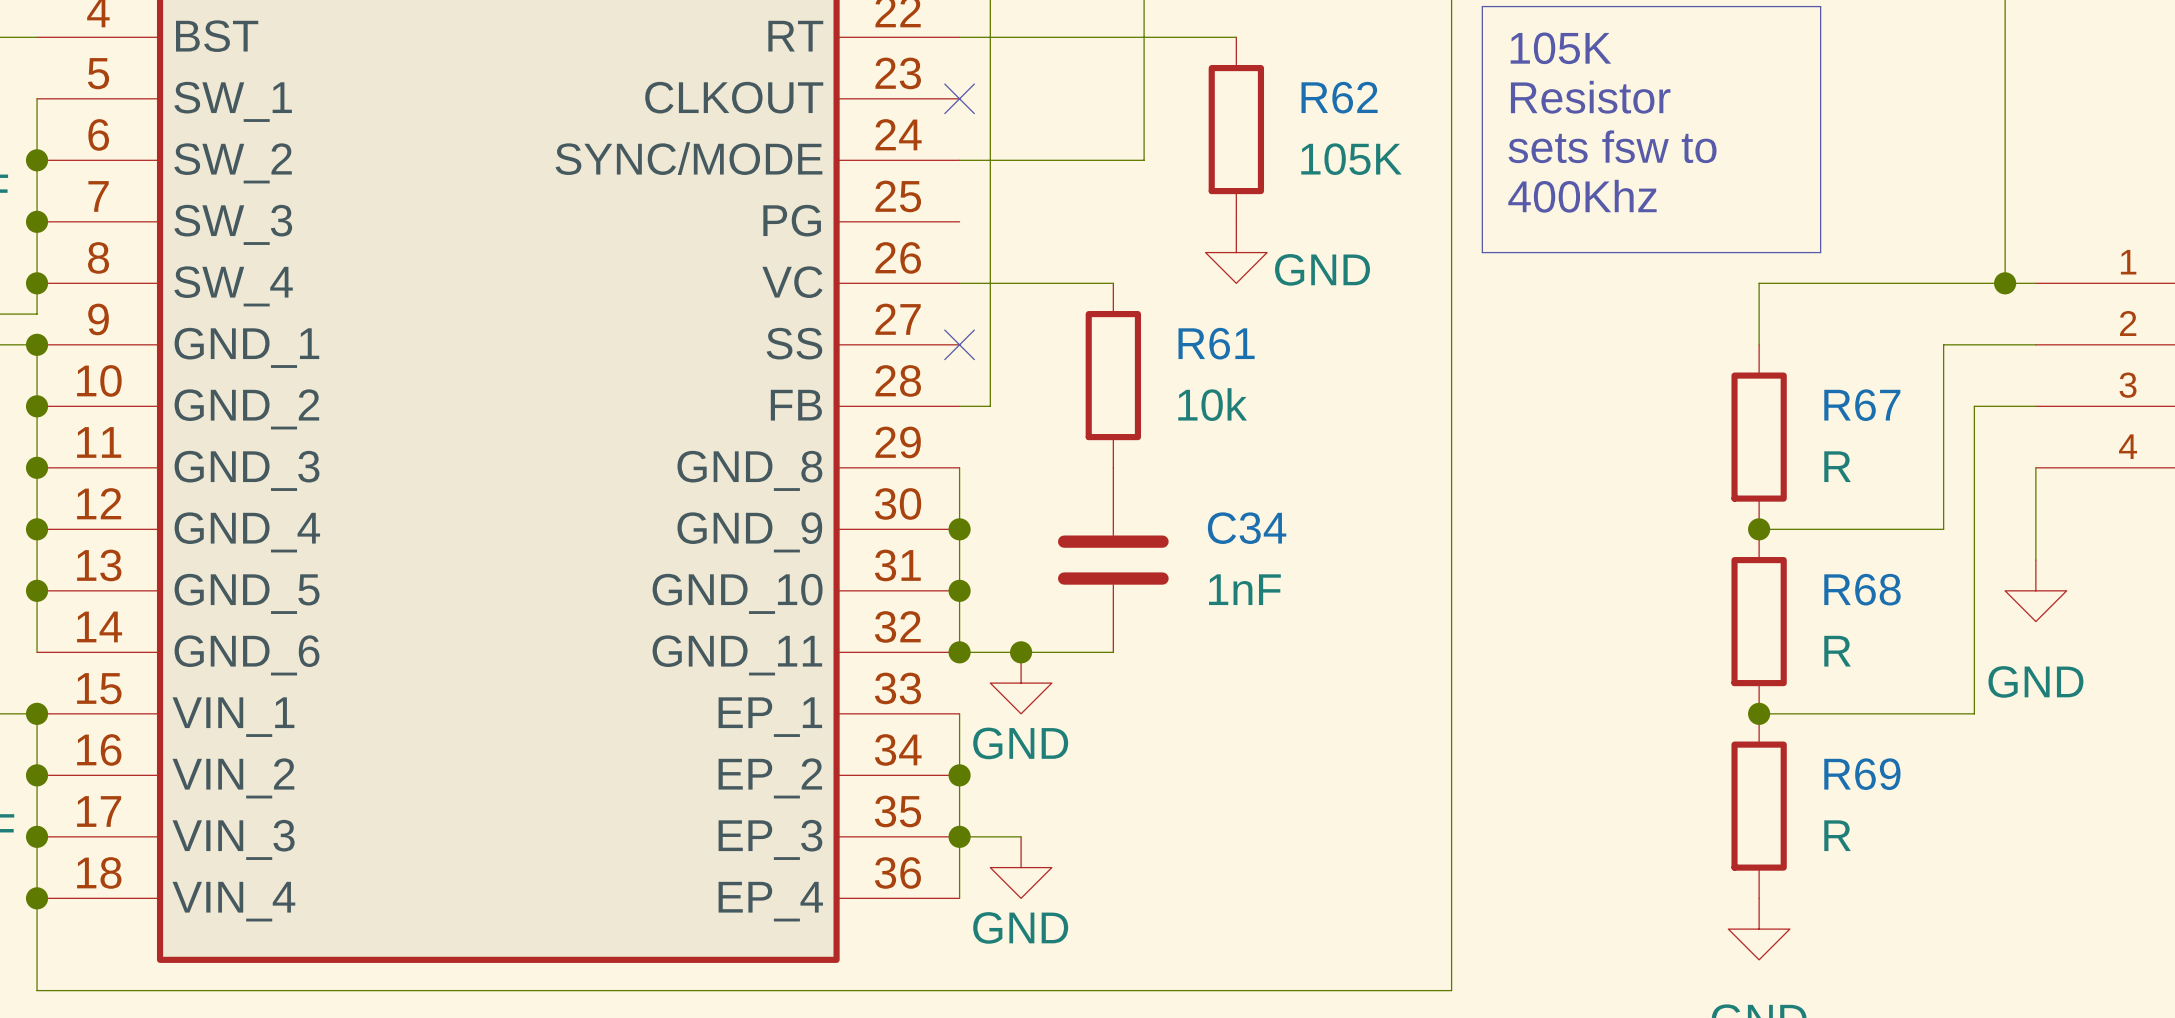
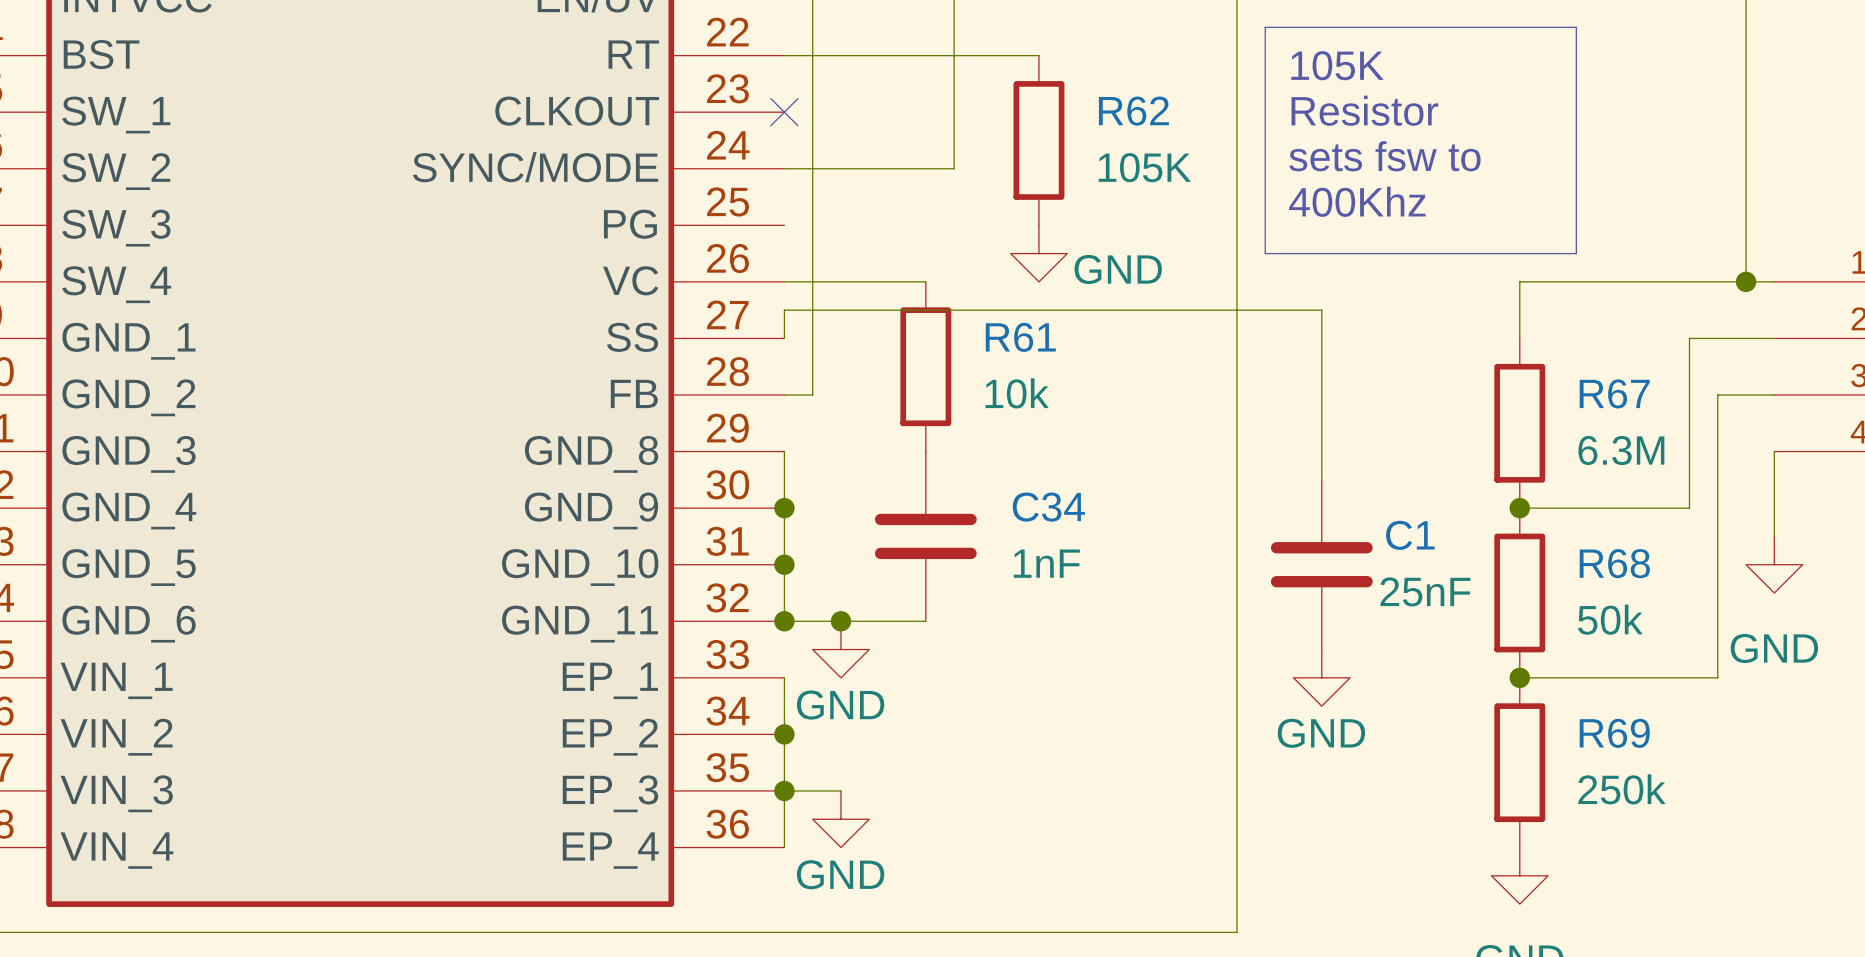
wire: none -> (784, 338) (784, 310) (1321, 310) (1321, 479)
no-connect mark: (959, 344) -> none
R67 value: R (1837, 466) -> 6.3M (1621, 450)
C1: none -> 25nF (1321, 564)
R68 value: R (1837, 651) -> 50k (1610, 619)
power symbol: none -> GND (1321, 677)
R69 value: R (1837, 835) -> 250k (1621, 789)

